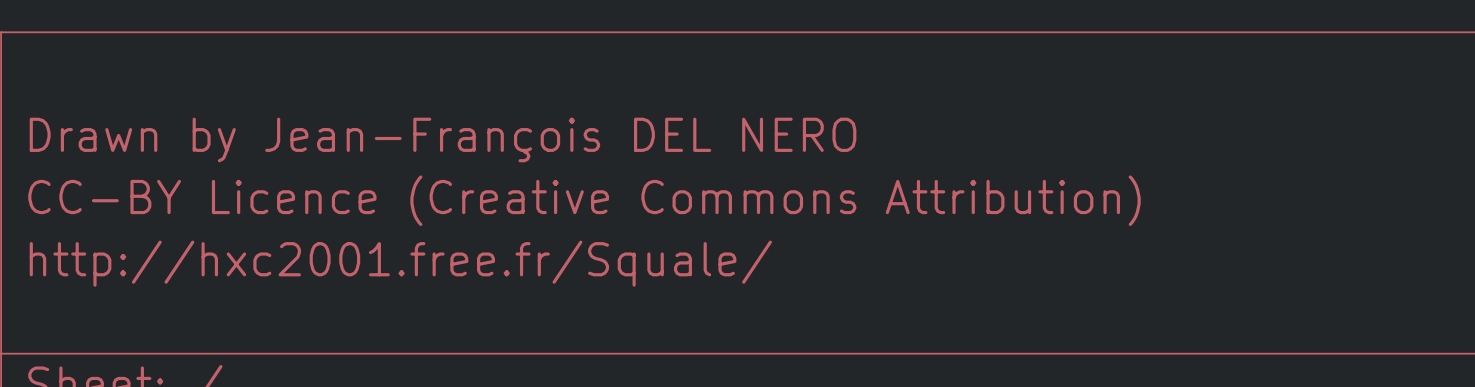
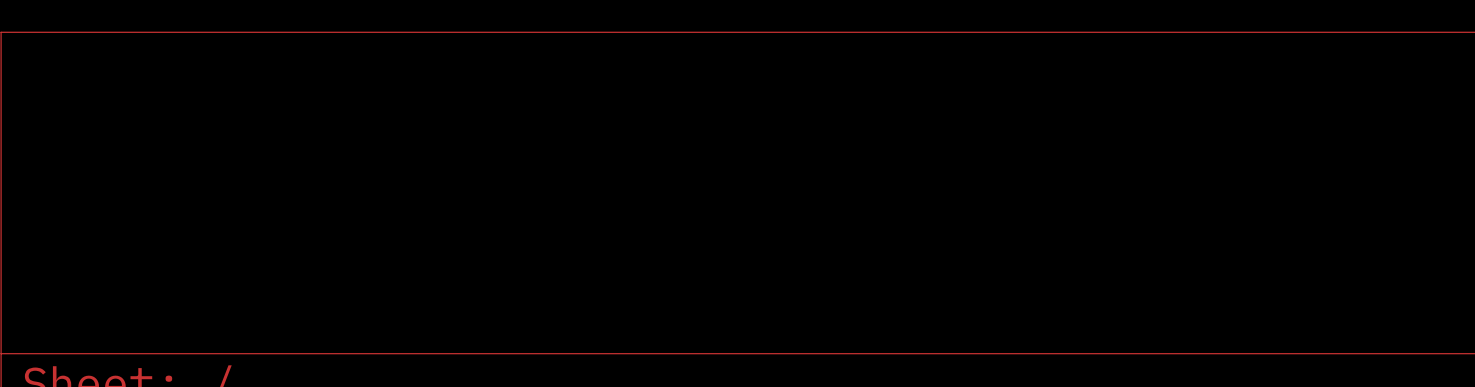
title block: Drawn by Jean-François DEL NERO (443, 139) -> none
title block: CC-BY Licence (Creative Commons Attribution) (584, 200) -> none
title block: http://hxc2001.free.fr/Squale/ (400, 263) -> none

